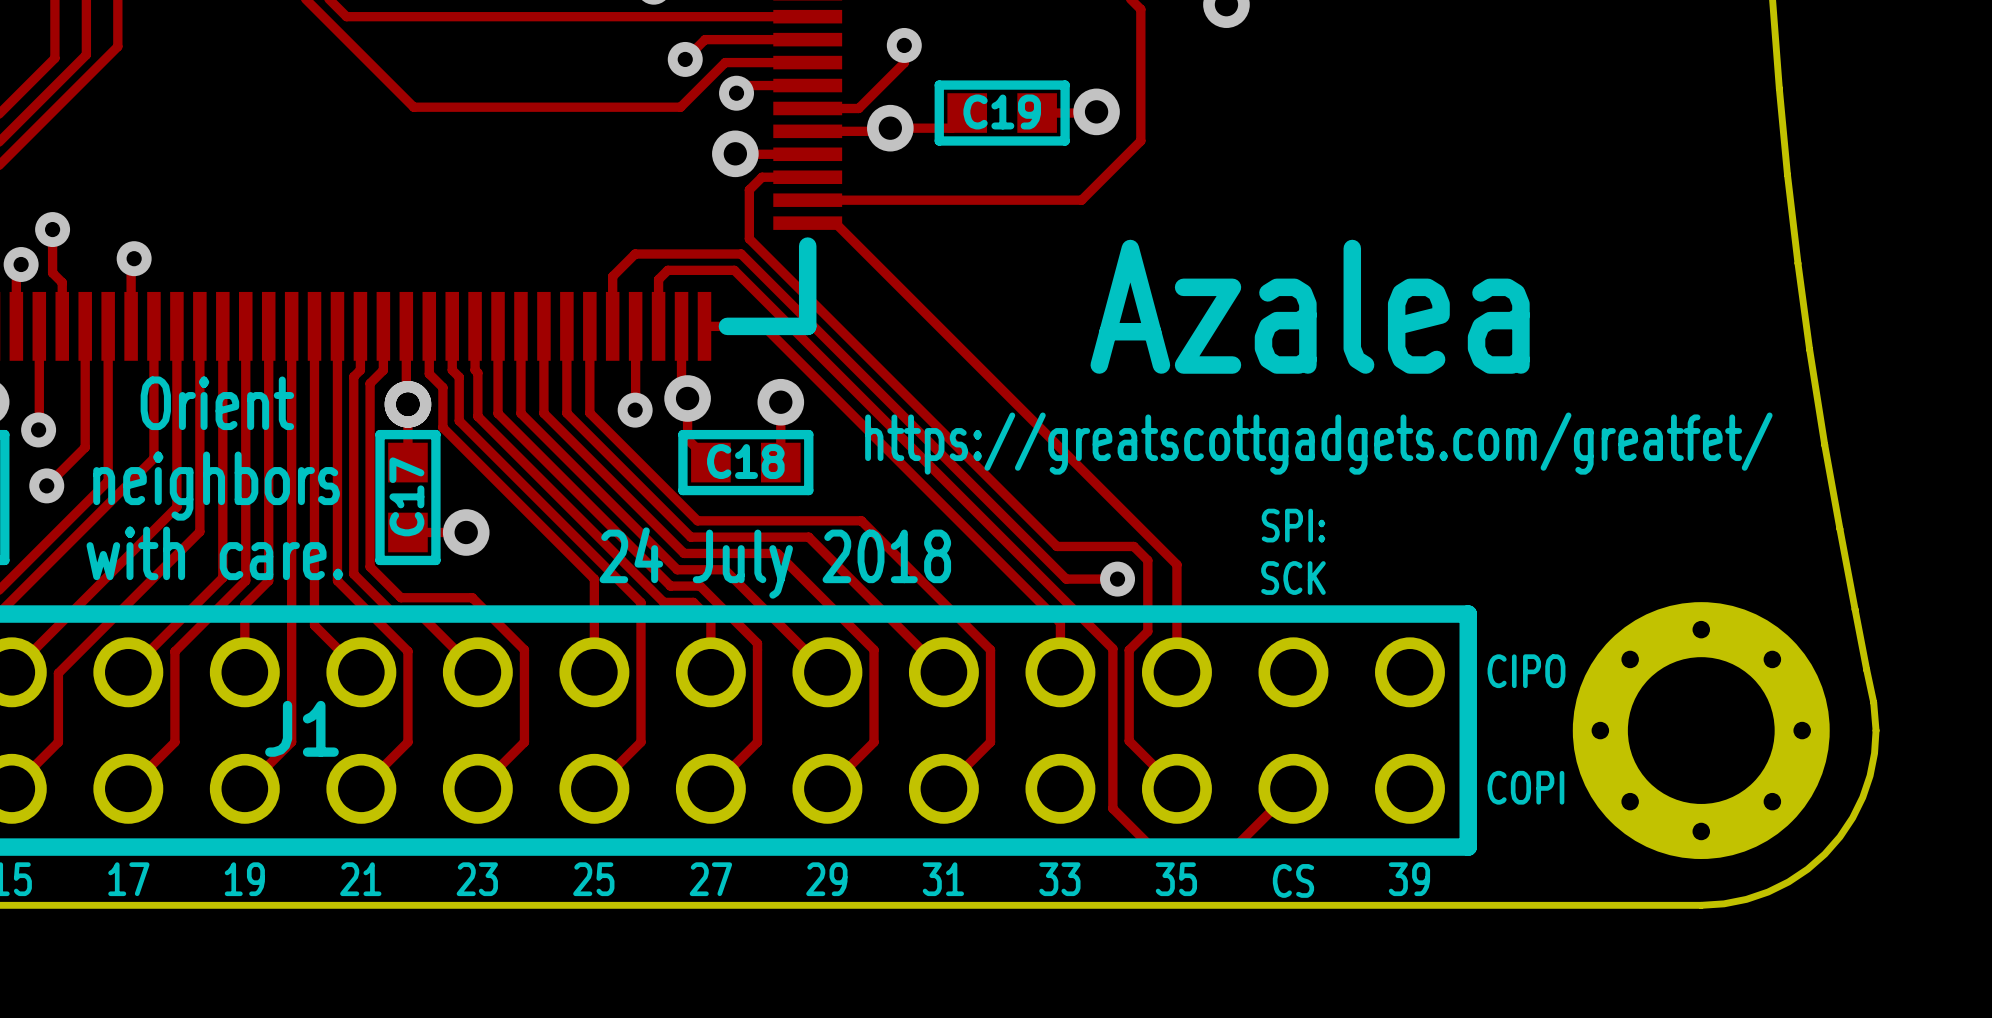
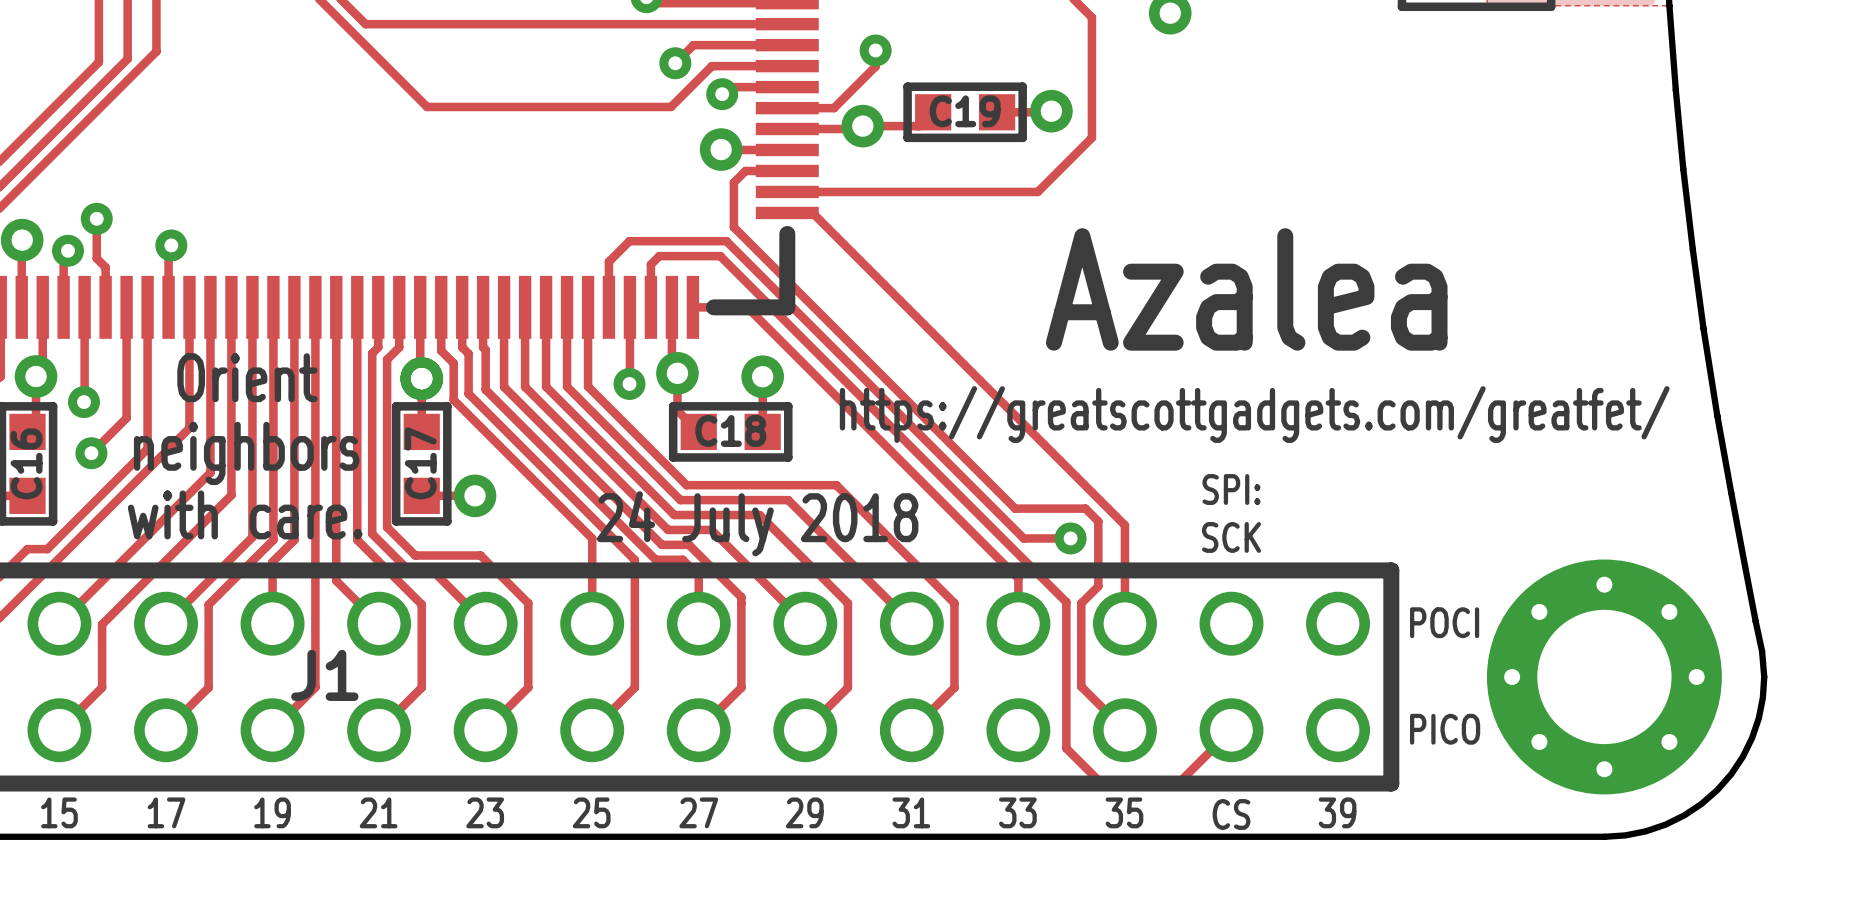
text: CIPO (1526, 671) -> POCI (1444, 622)
text: COPI (1525, 787) -> PICO (1445, 729)

